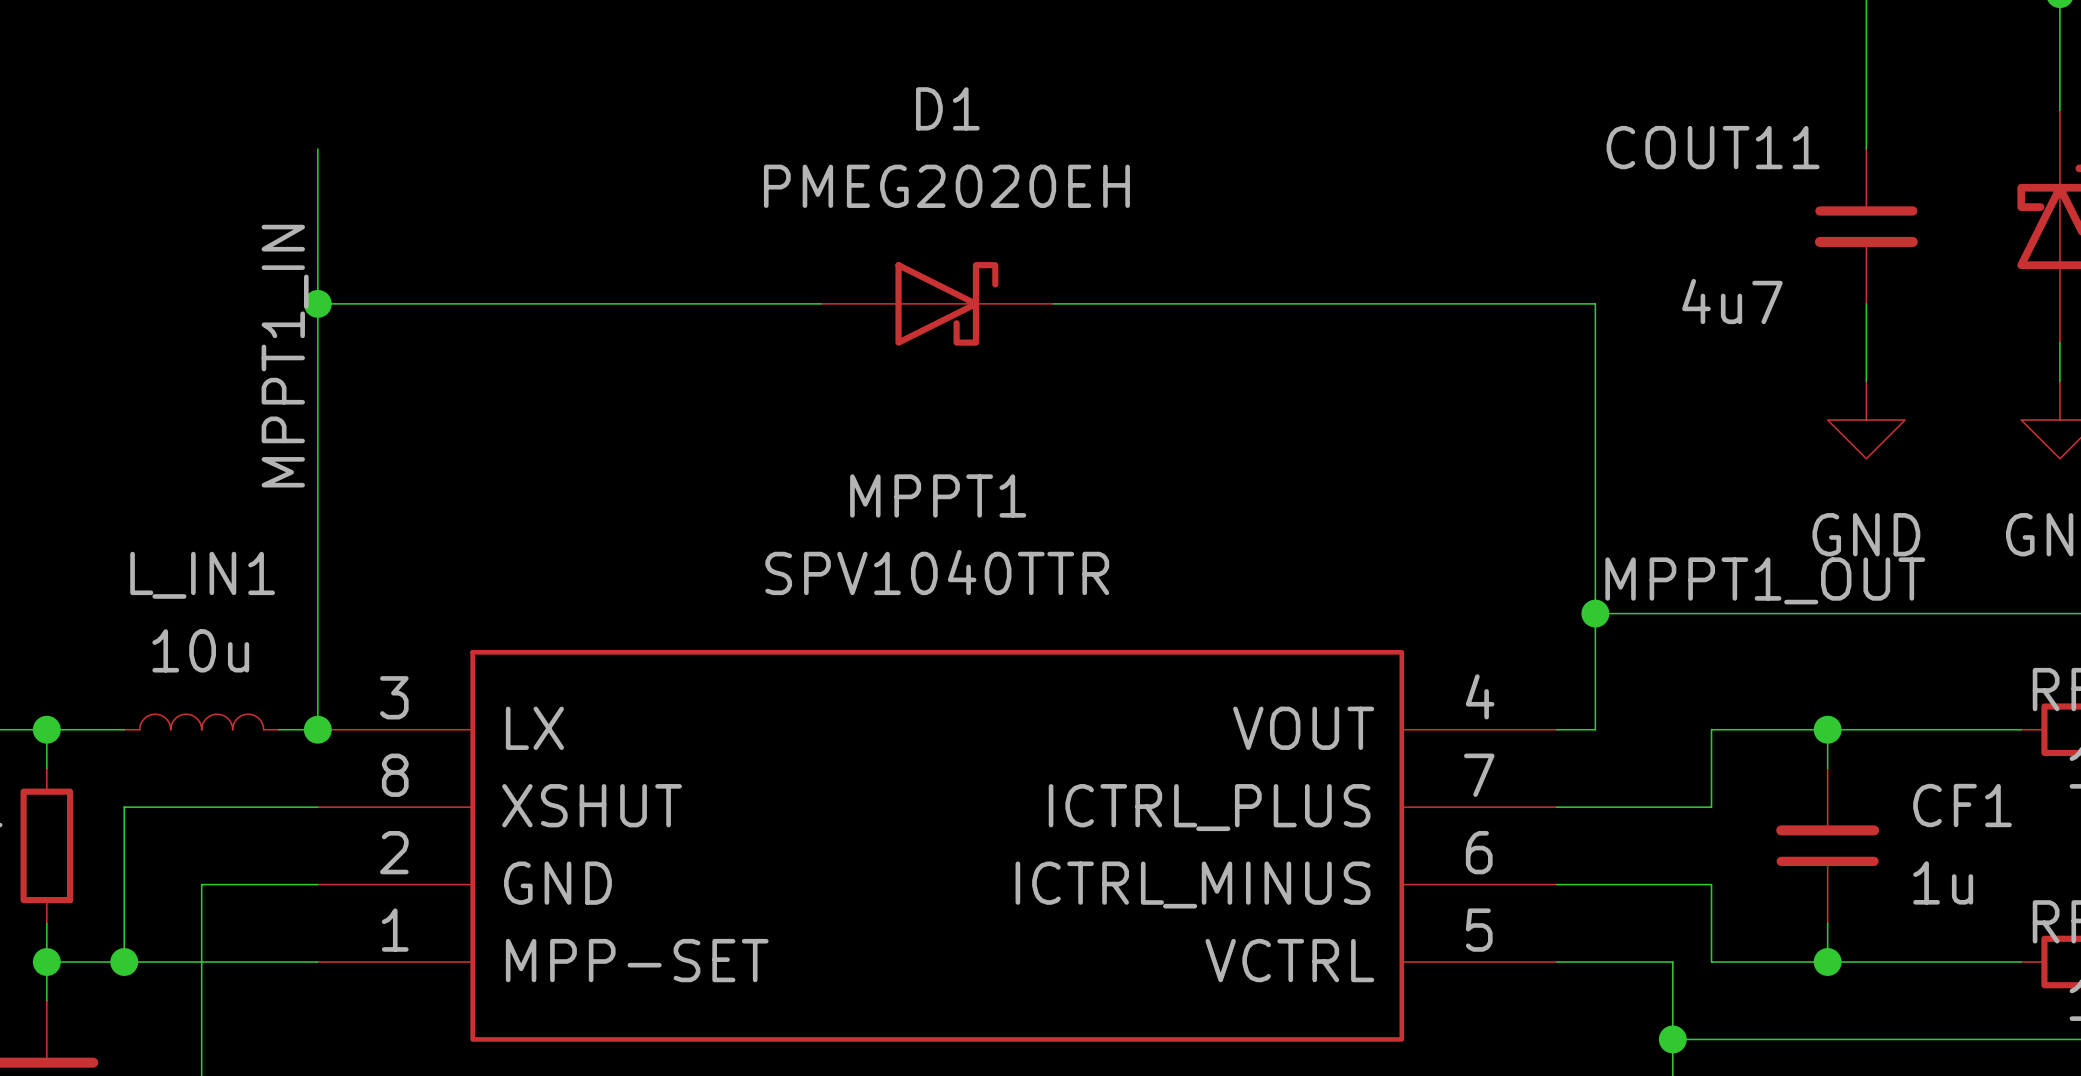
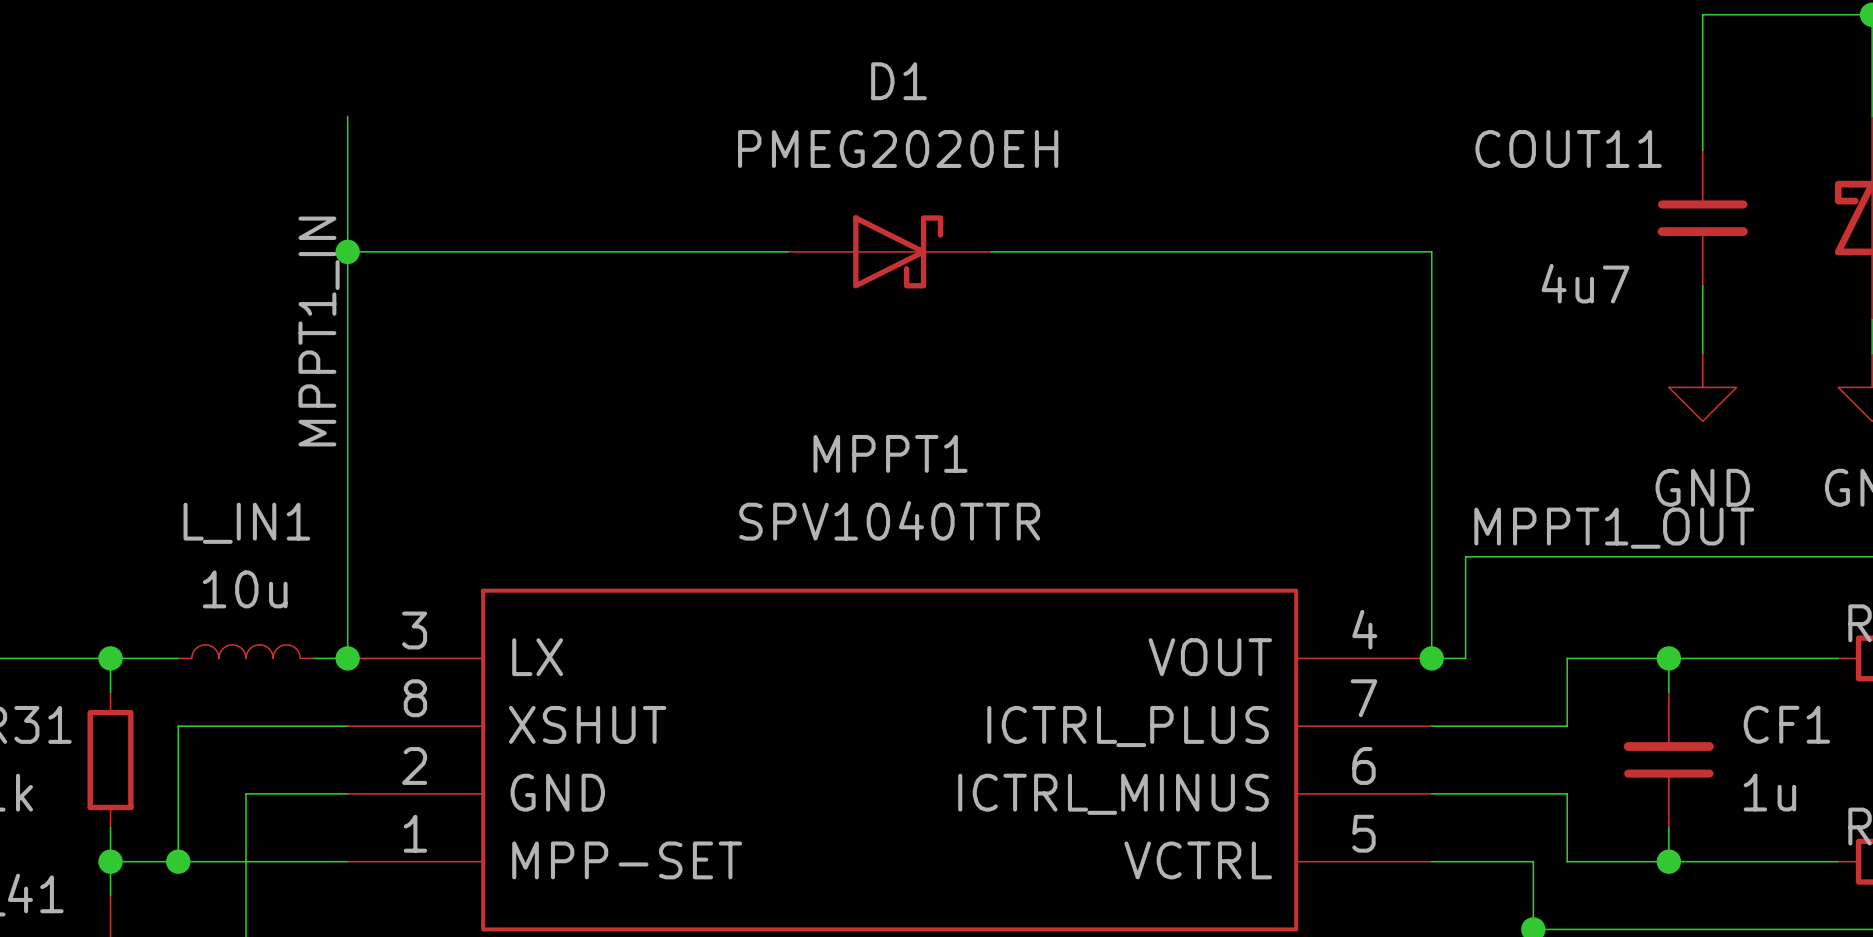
wire: none -> (347, 116) (347, 150)
wire: none -> (991, 251) (1431, 251) (1431, 658)
wire: (317, 303) (821, 303) -> (347, 251) (788, 251)
junction position: (317, 303) -> (347, 251)
D1 position: (937, 303) -> (889, 251)
wire: (1053, 303) (1595, 303) (1595, 613) -> none
junction position: (1595, 613) -> (1431, 658)

